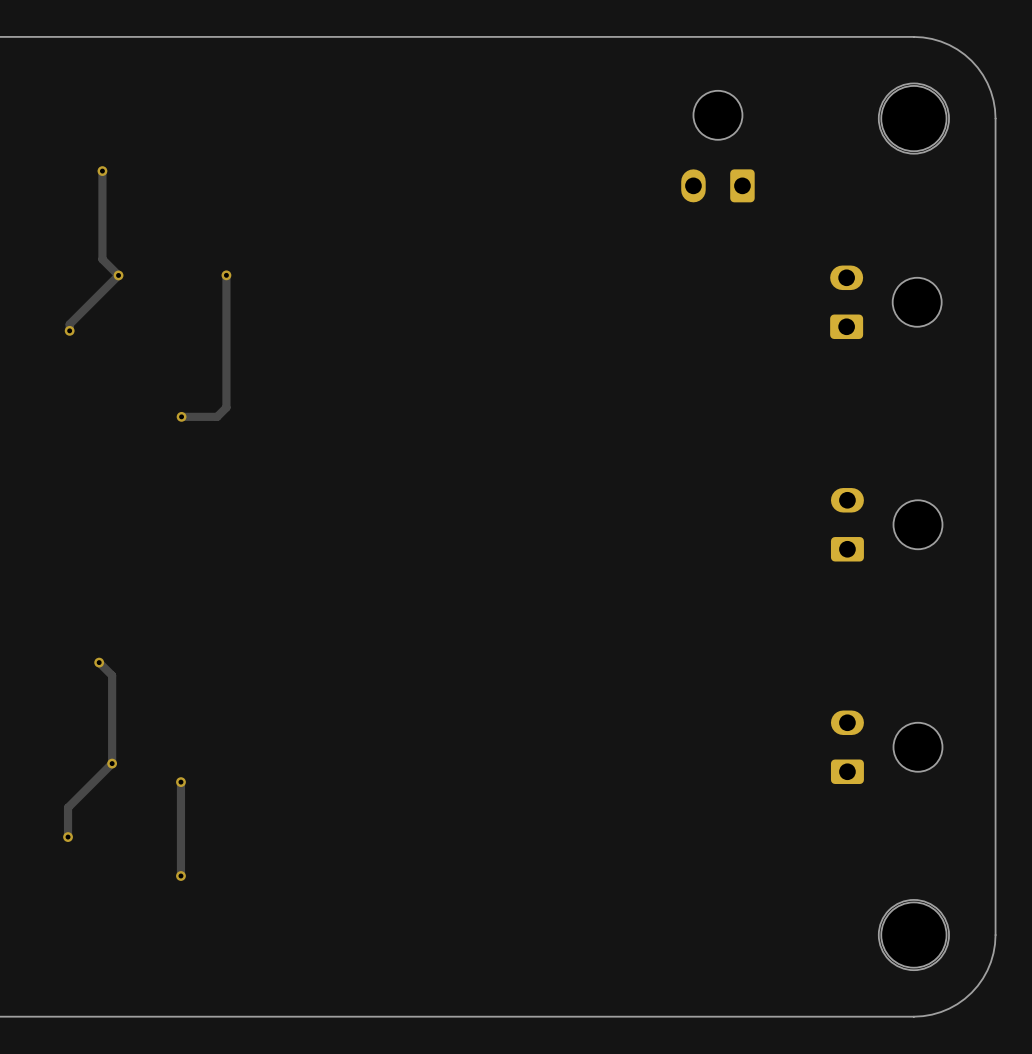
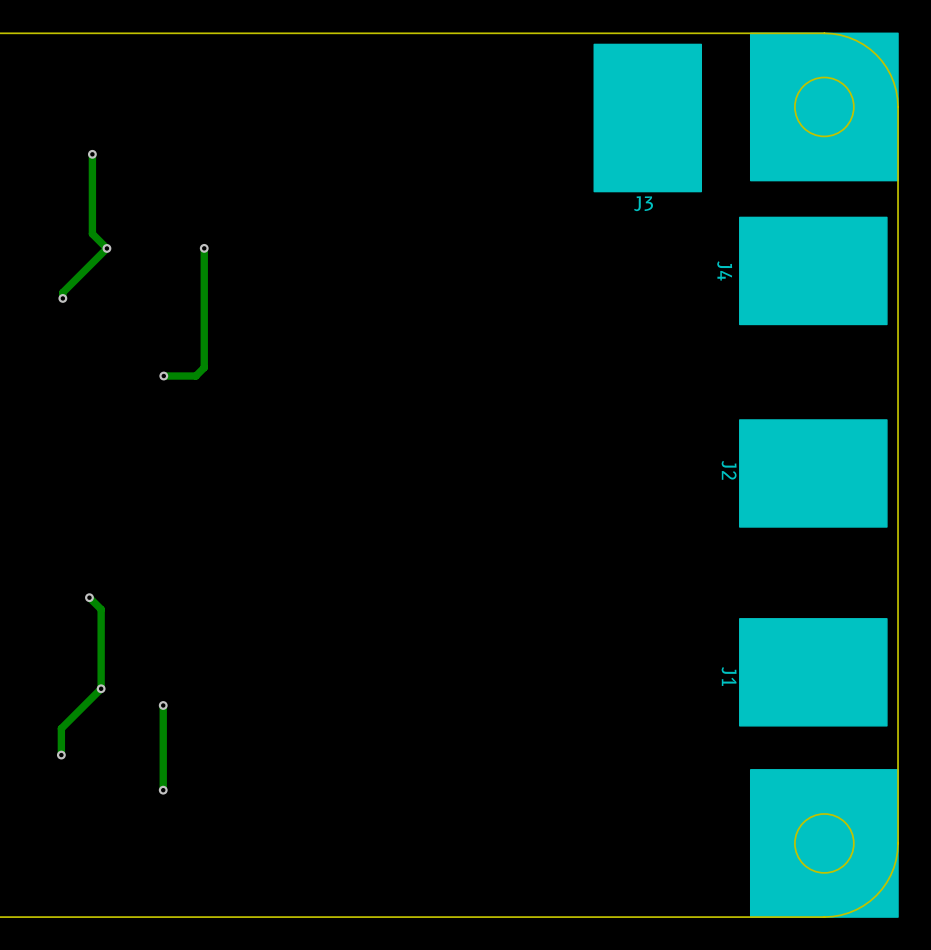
drawing: none -> [749, 32, 899, 182]
drawing: none -> [593, 43, 703, 193]
J3 name: none -> J3 (643, 203)
drawing: none -> [739, 216, 888, 326]
J4 name: none -> J4 (724, 270)
drawing: none -> [739, 419, 888, 528]
J2 name: none -> J2 (729, 470)
drawing: none -> [739, 618, 888, 727]
J1 name: none -> J1 (729, 676)
drawing: none -> [749, 769, 899, 918]

